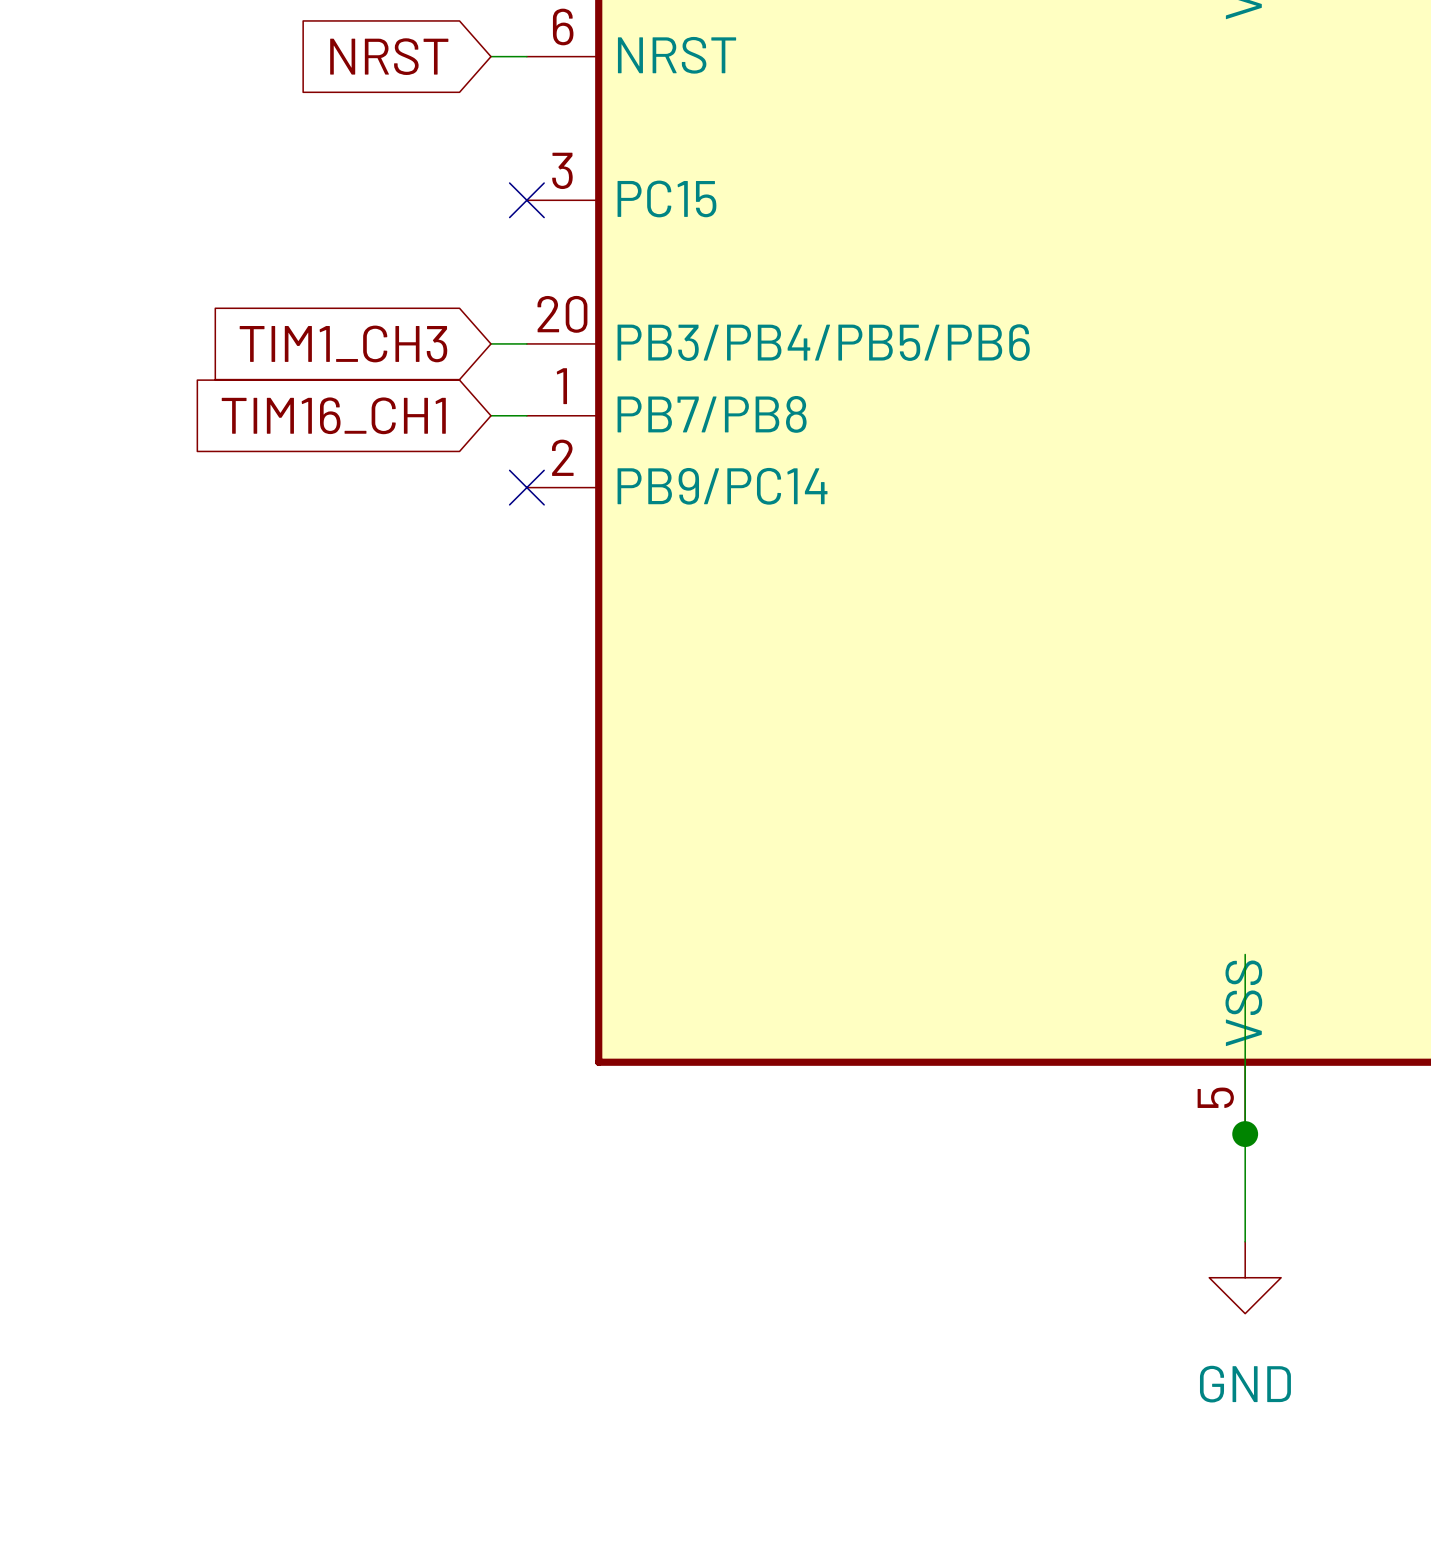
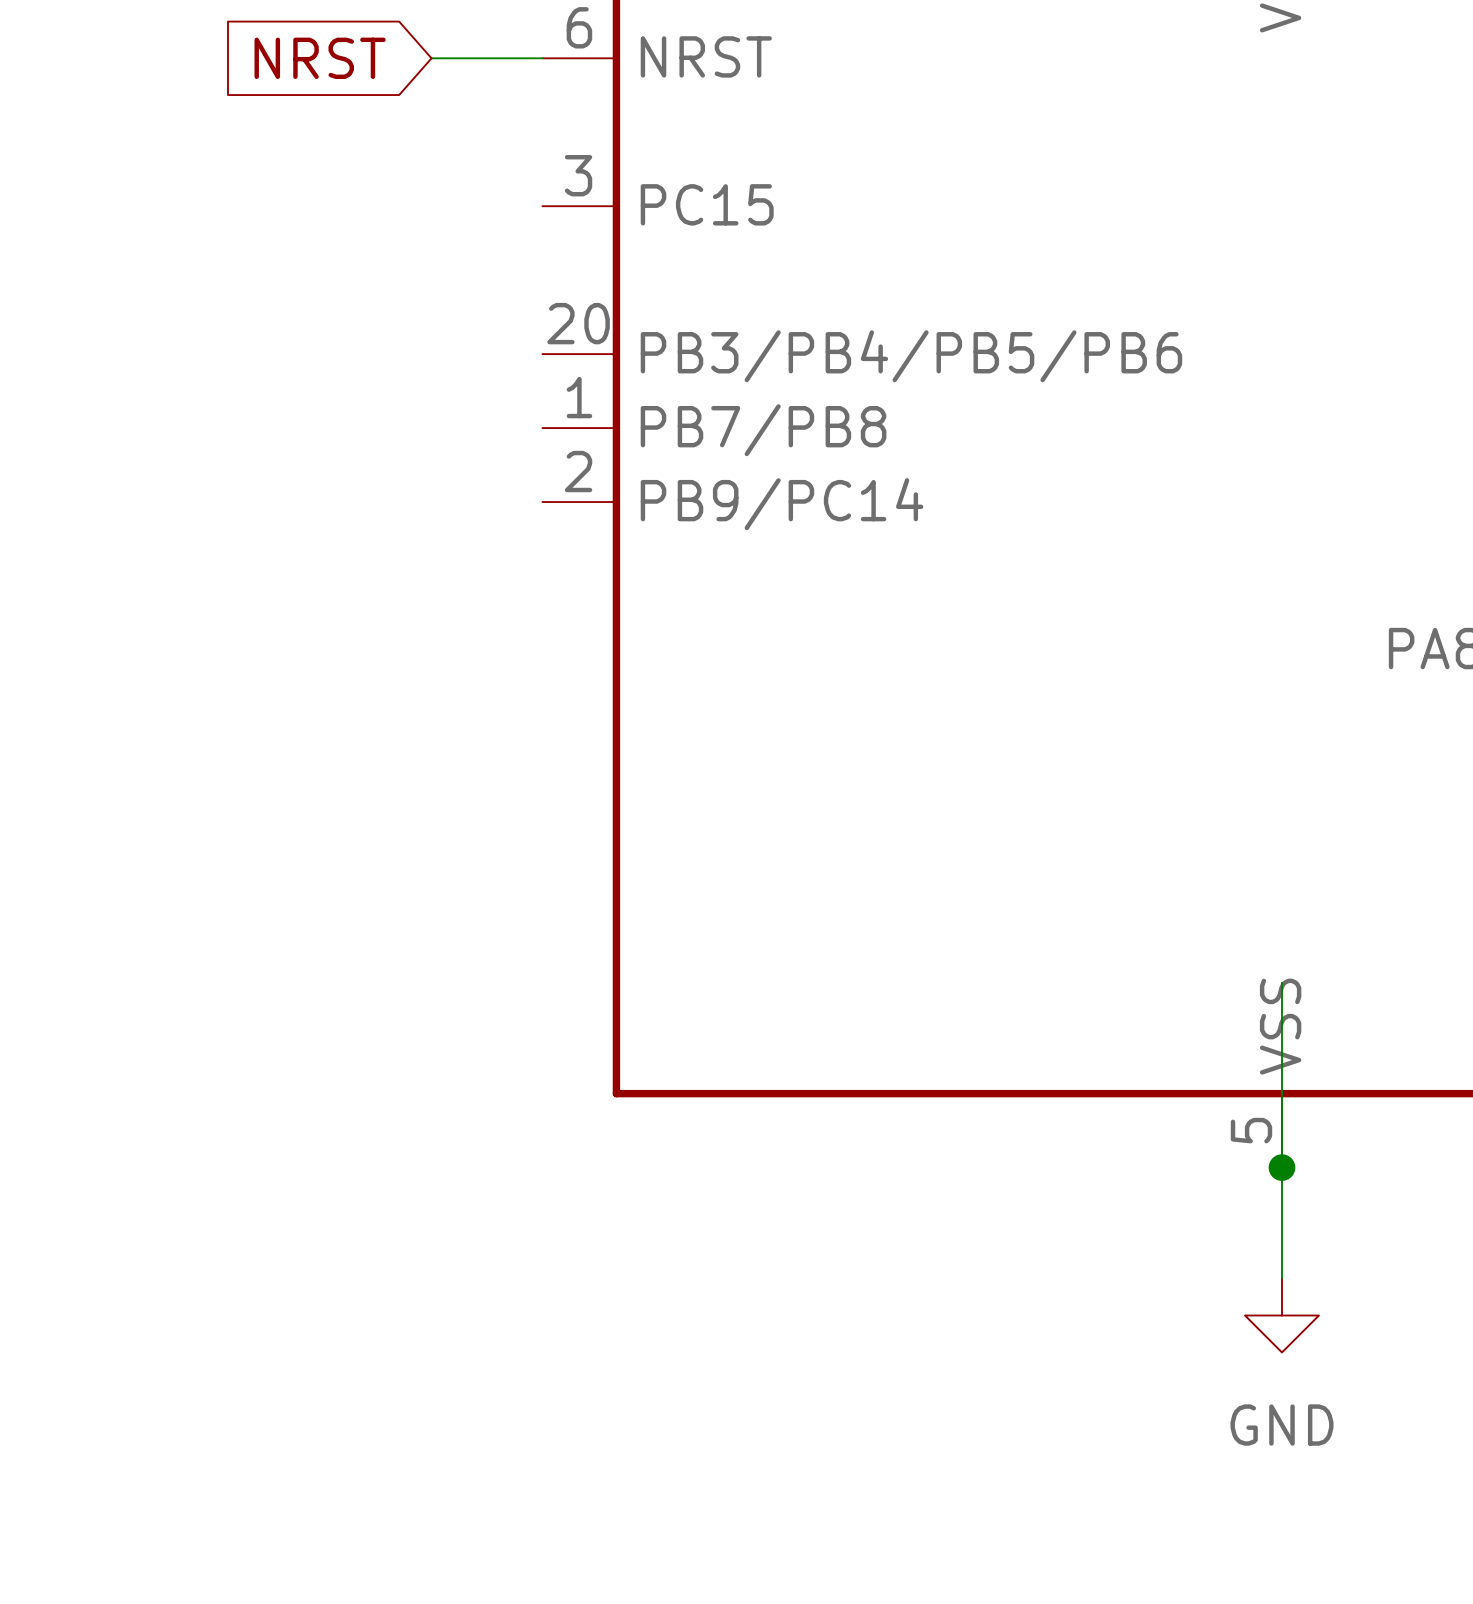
global label position: NRST (389, 56) -> NRST (320, 58)
wire: none -> (431, 58) (505, 58)
no-connect mark: (526, 200) -> none
global label: TIM1_CH3 (343, 343) -> none
wire: (490, 343) (526, 343) -> none
global label: TIM16_CH1 (333, 415) -> none
wire: (490, 415) (526, 415) -> none
no-connect mark: (526, 487) -> none

